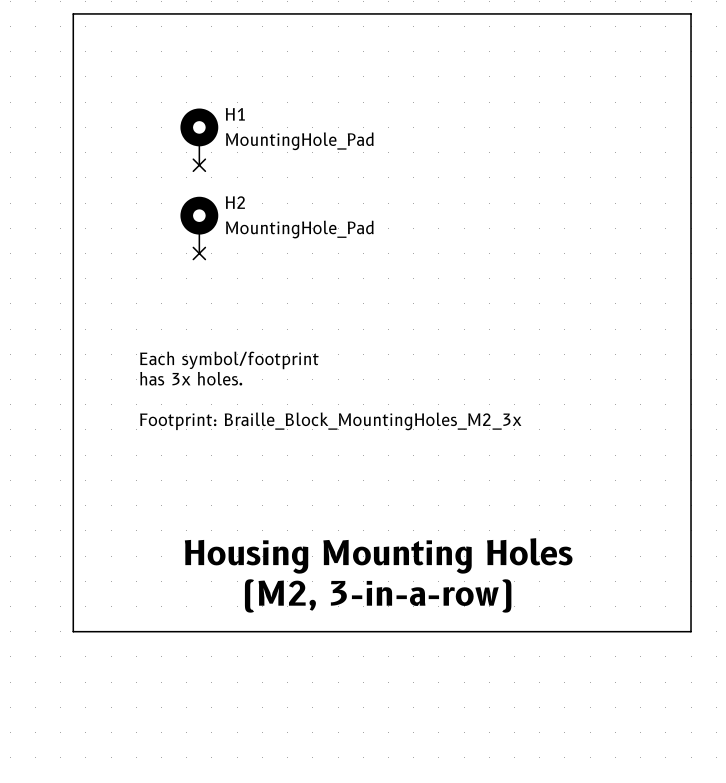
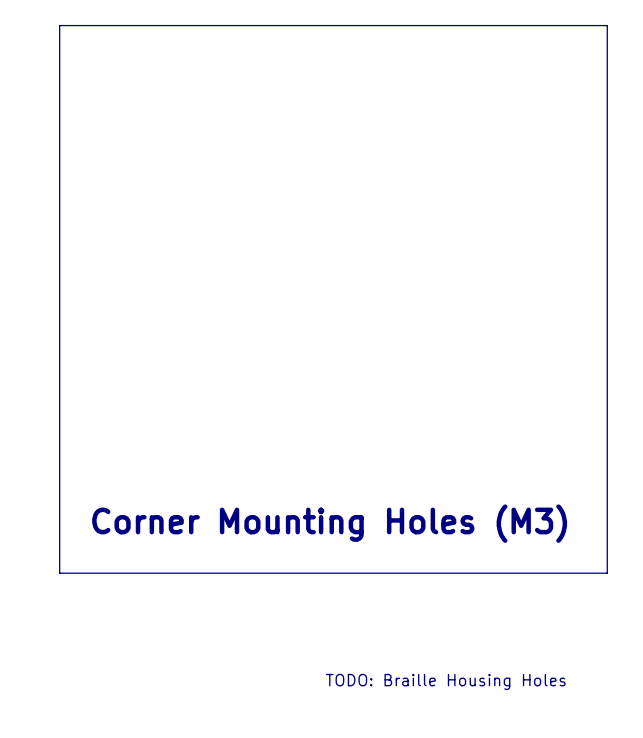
H1: MountingHole_Pad (199, 136) -> none
no-connect mark: (199, 165) -> none
H2: MountingHole_Pad (199, 225) -> none
no-connect mark: (199, 253) -> none
text: Each symbol/footprint (229, 360) -> none
text: has 3x holes. (191, 378) -> none
text: Footprint: Braille_Block_MountingHoles_M2_3x (330, 421) -> none
text: Housing Mounting Holes (378, 555) -> Corner Mounting Holes (M3) (329, 523)
text: (M2, 3-in-a-row) (378, 595) -> none
text: none -> TODO: Braille Housing Holes (445, 681)

